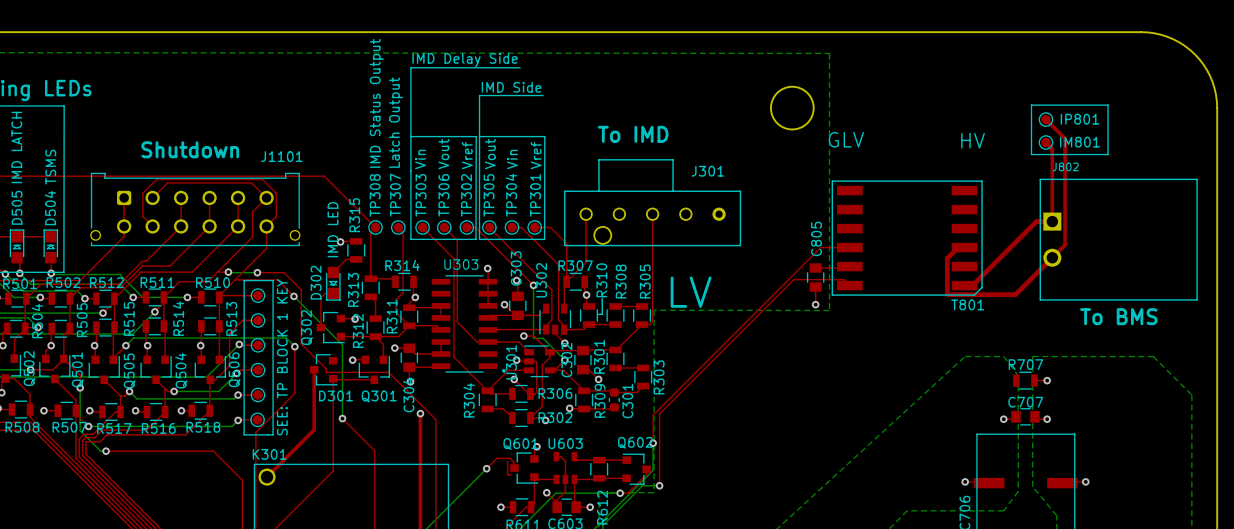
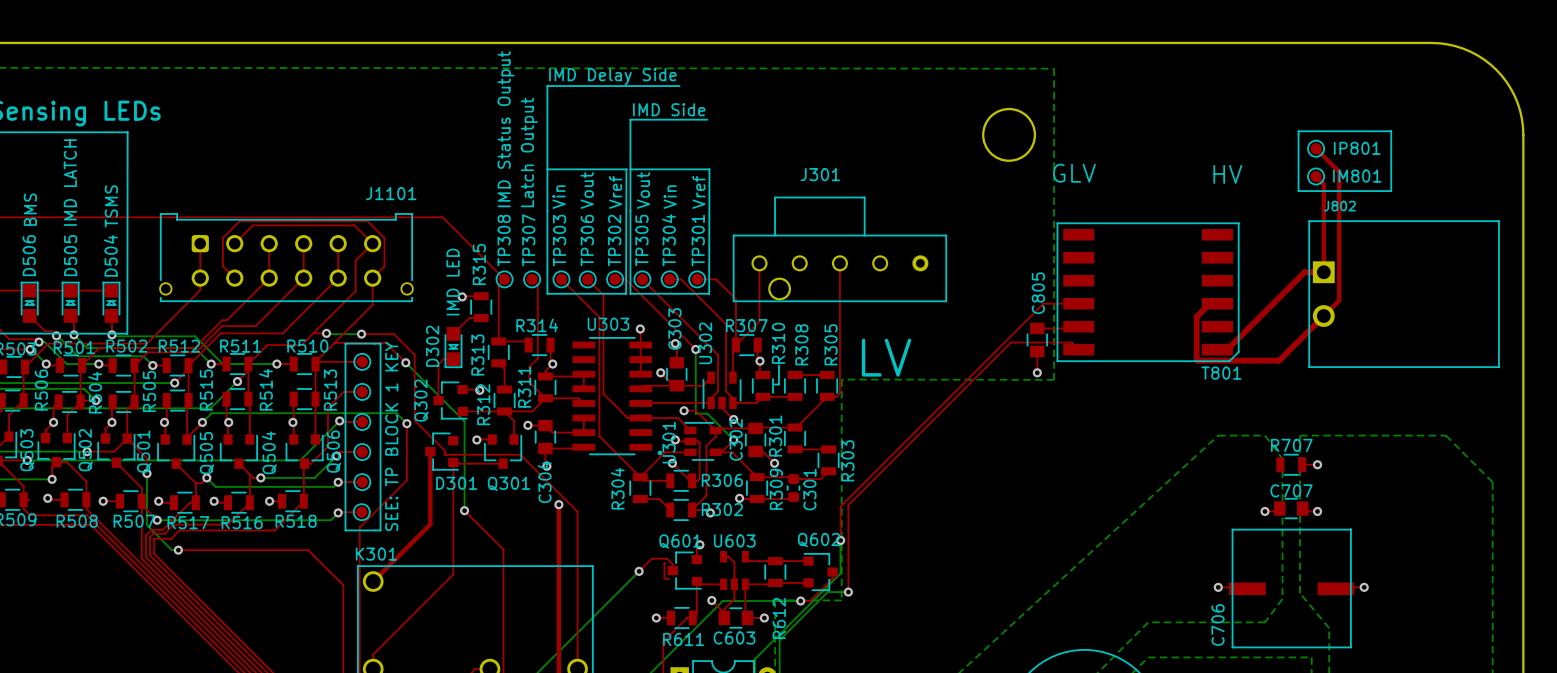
text: To IMD (633, 134) -> none
text: Shutdown (190, 149) -> none
J301 name position: J301 (707, 171) -> J301 (820, 174)
text: To BMS (1118, 316) -> none

